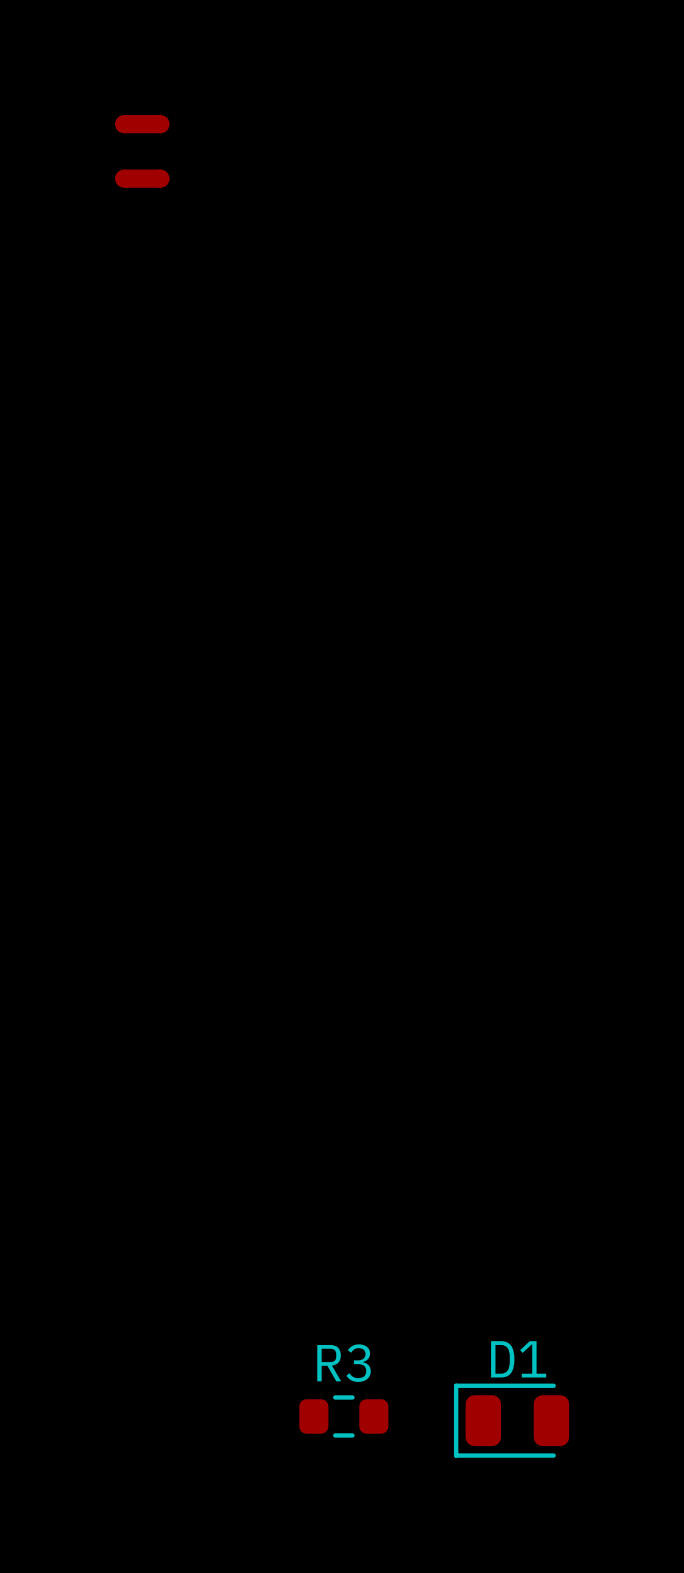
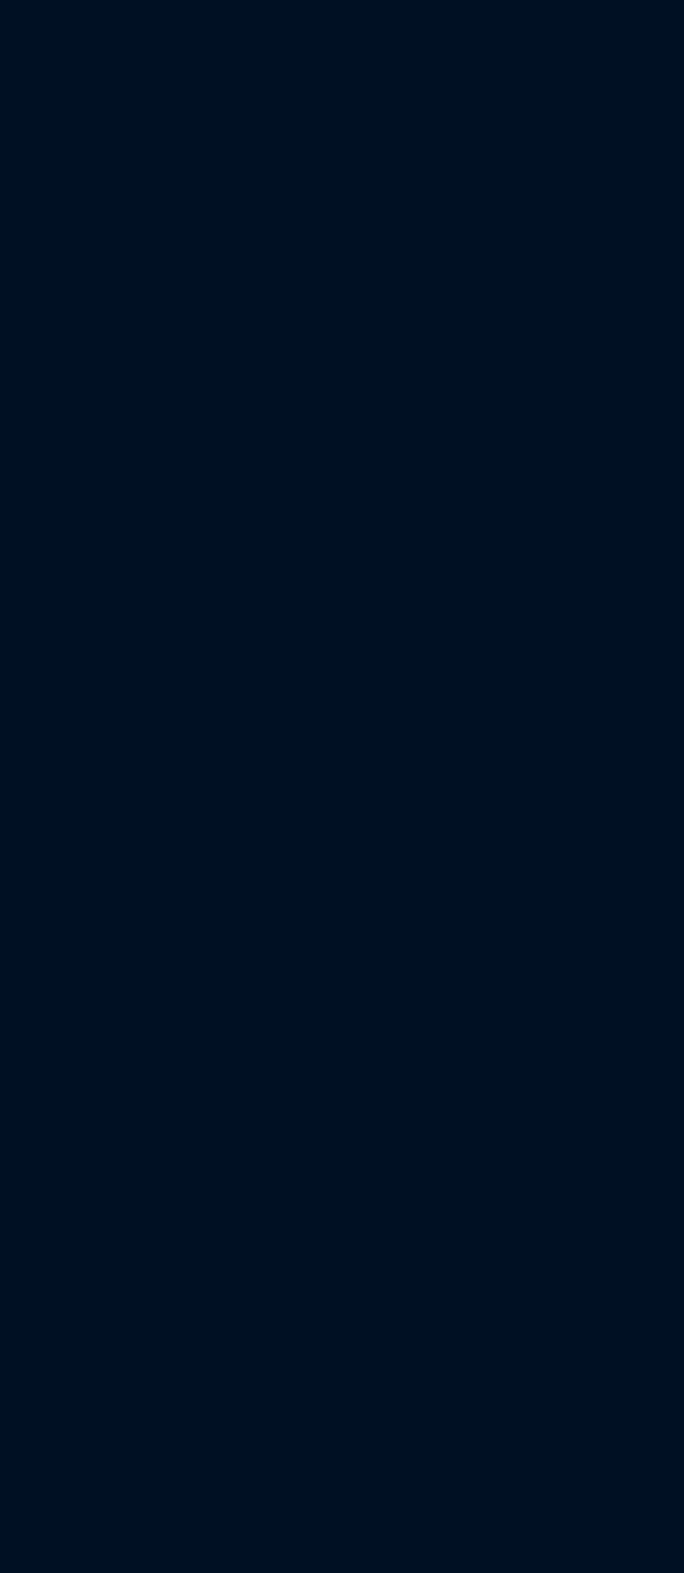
part: (142, 124) -> none
part: (142, 178) -> none
R3: (343, 1416) -> none
D1: (511, 1420) -> none

